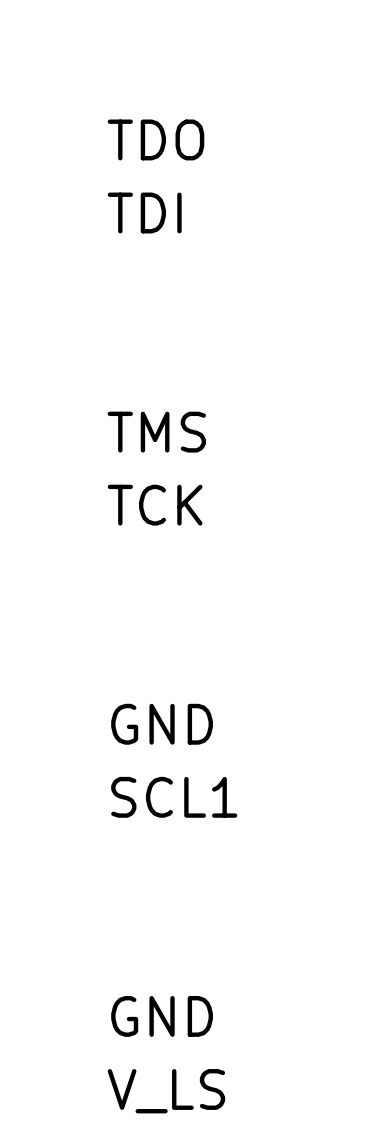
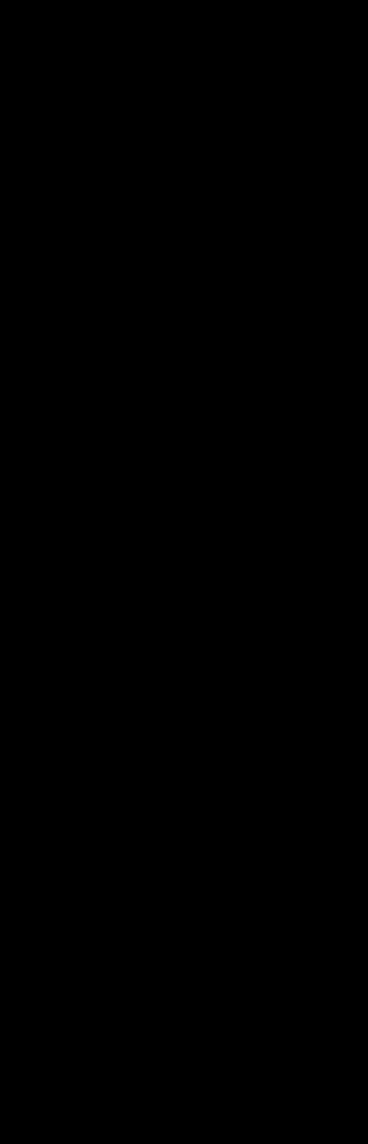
label: TDO (155, 139) -> none
label: TDI (144, 213) -> none
label: TMS (156, 432) -> none
label: TCK (155, 505) -> none
label: GND (162, 724) -> none
label: SCL1 (174, 797) -> none
label: GND (162, 1016) -> none
label: V_LS (166, 1091) -> none

